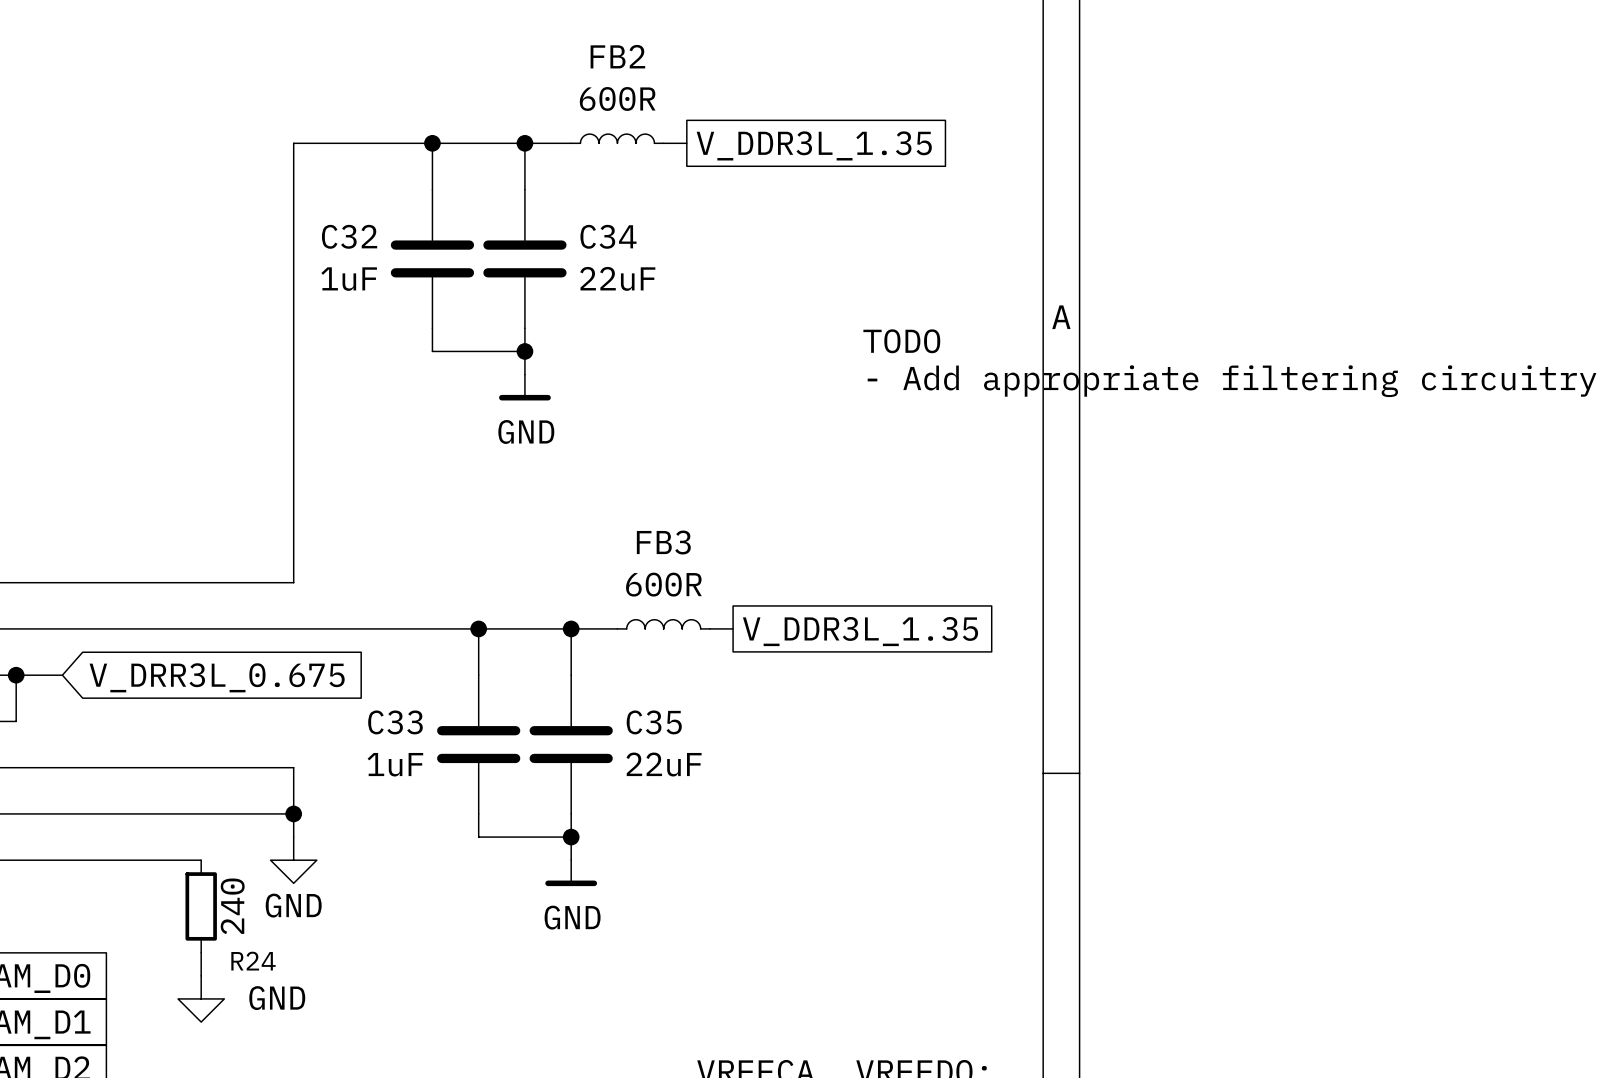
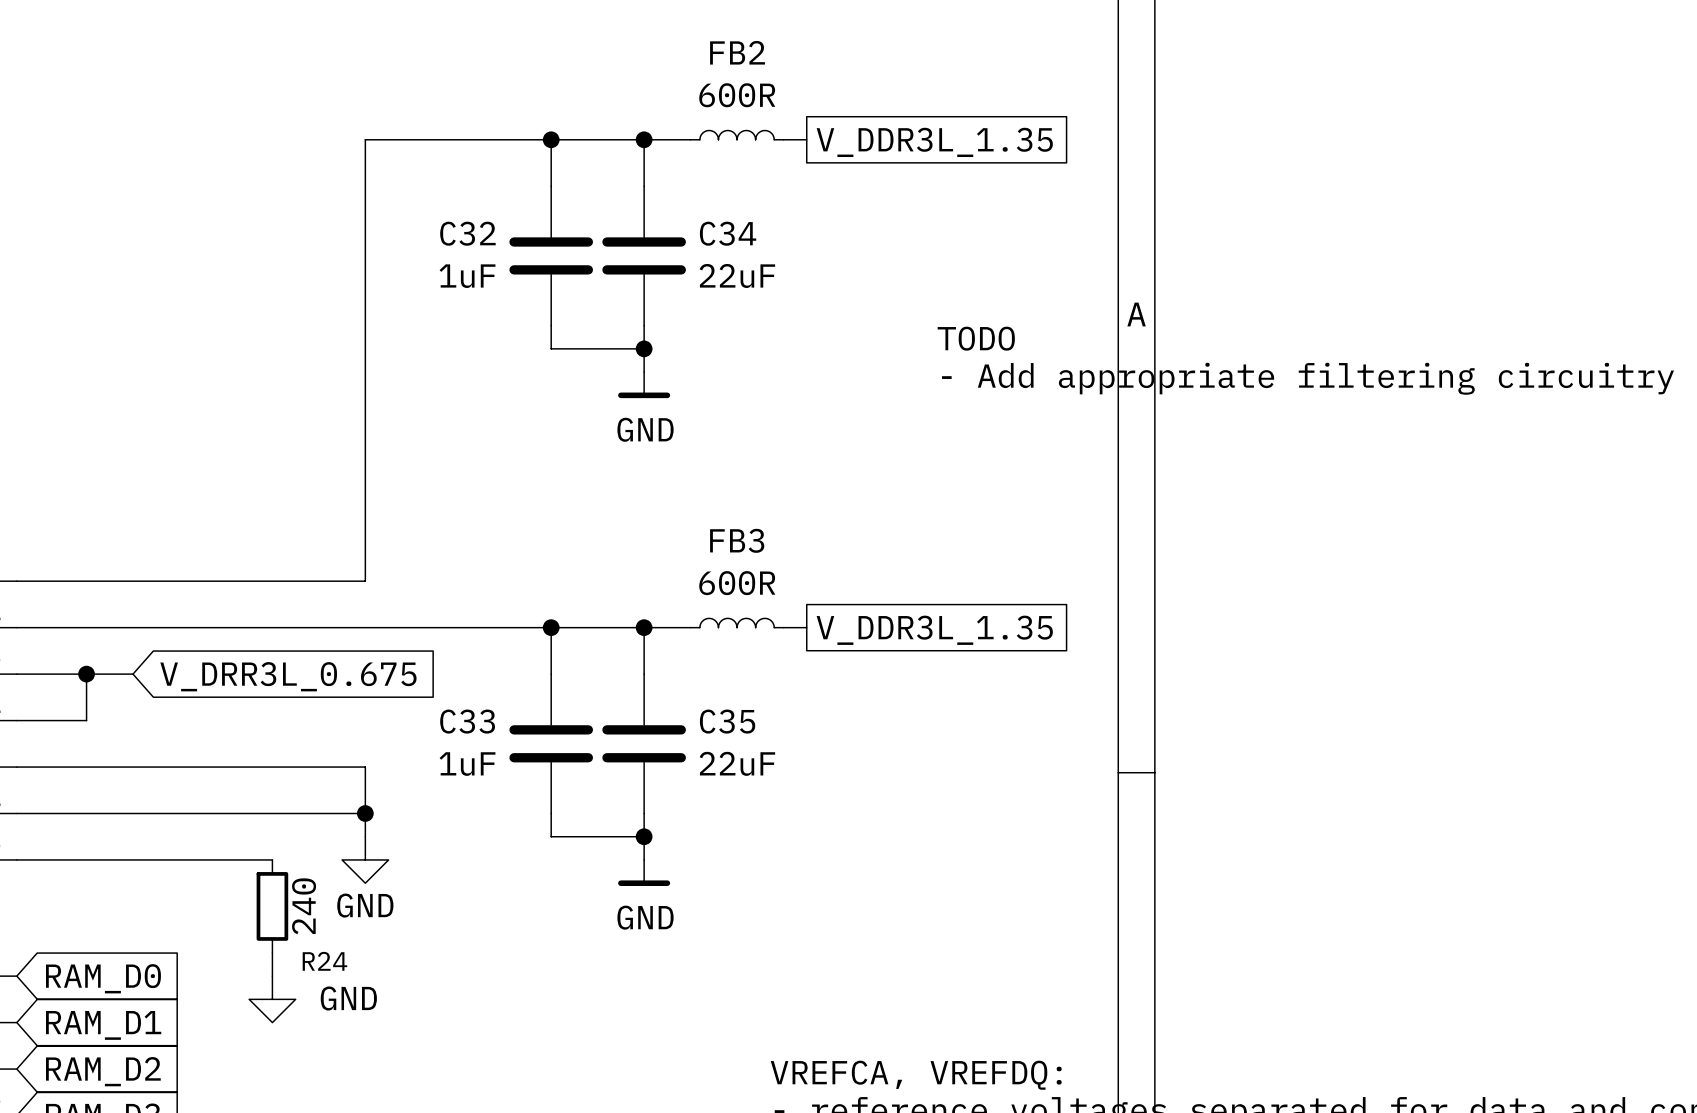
FB2 position: (617, 138) -> (737, 135)
wire: (432, 143) (432, 189) -> (551, 139) (551, 186)
junction: (432, 143) -> none
junction: none -> (551, 139)
wire: (524, 143) (524, 189) -> none
junction: (524, 143) -> none
junction: none -> (644, 139)
wire: none -> (690, 139) (644, 139) (644, 186)
wire: (663, 143) (686, 143) -> (783, 139) (806, 139)
global label position: V_DDR3L_1.35 (814, 145) -> V_DDR3L_1.35 (934, 142)
C32 position: (432, 258) -> (551, 255)
C34 position: (524, 258) -> (644, 255)
wire: (432, 328) (432, 351) (478, 351) -> (551, 325) (551, 348)
wire: (524, 328) (524, 374) -> (644, 325) (644, 372)
wire: none -> (597, 348) (644, 348)
junction position: (524, 351) -> (644, 348)
power symbol position: GND (524, 387) -> GND (644, 385)

